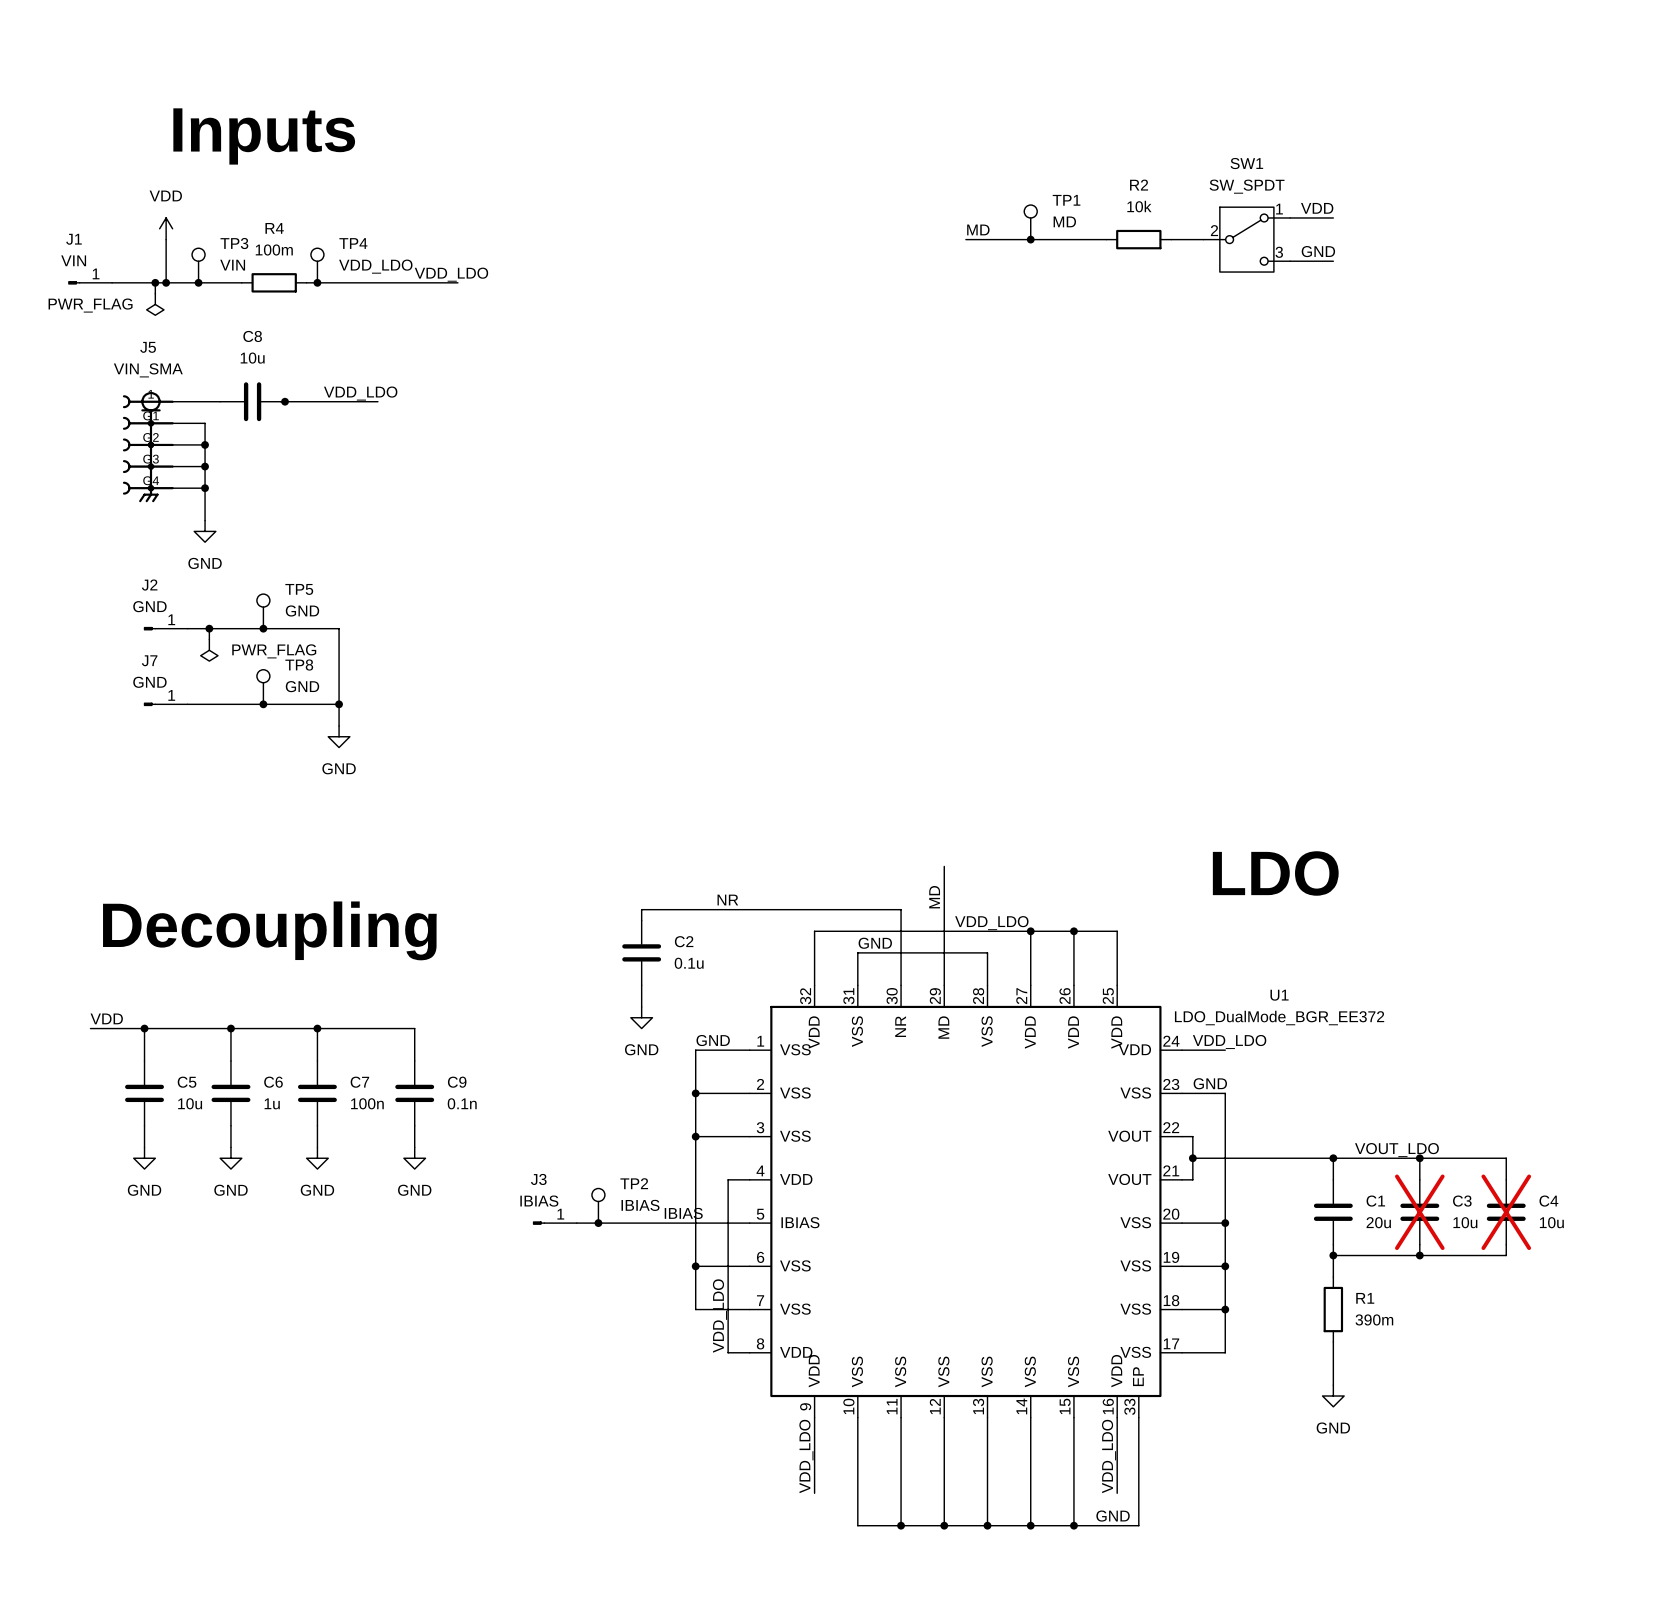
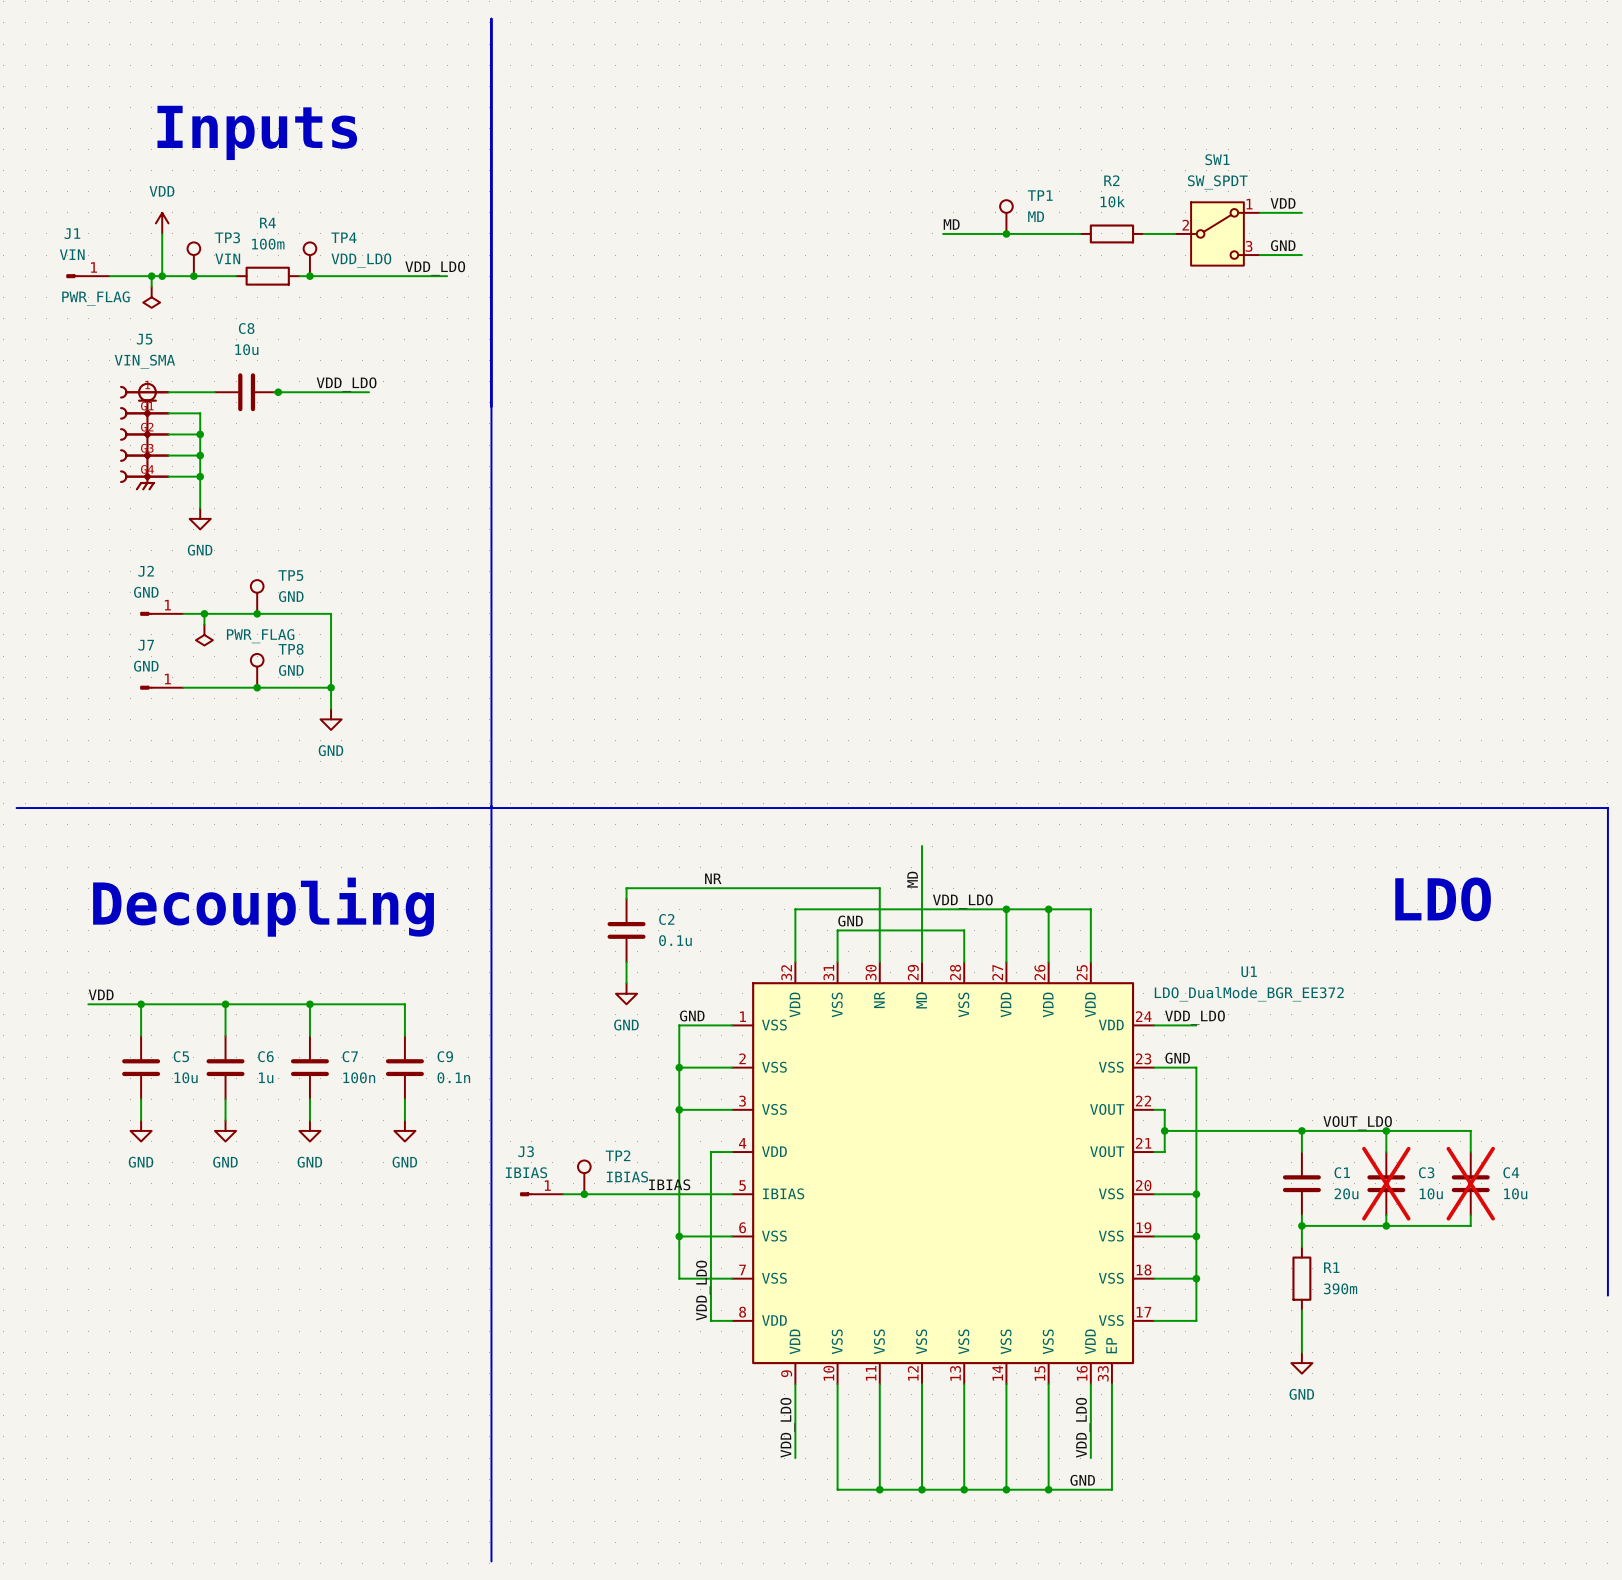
line: none -> (491, 18) (491, 1561)
line: none -> (16, 808) (1607, 808) (1607, 1295)
text position: LDO (1275, 873) -> LDO (1443, 899)

